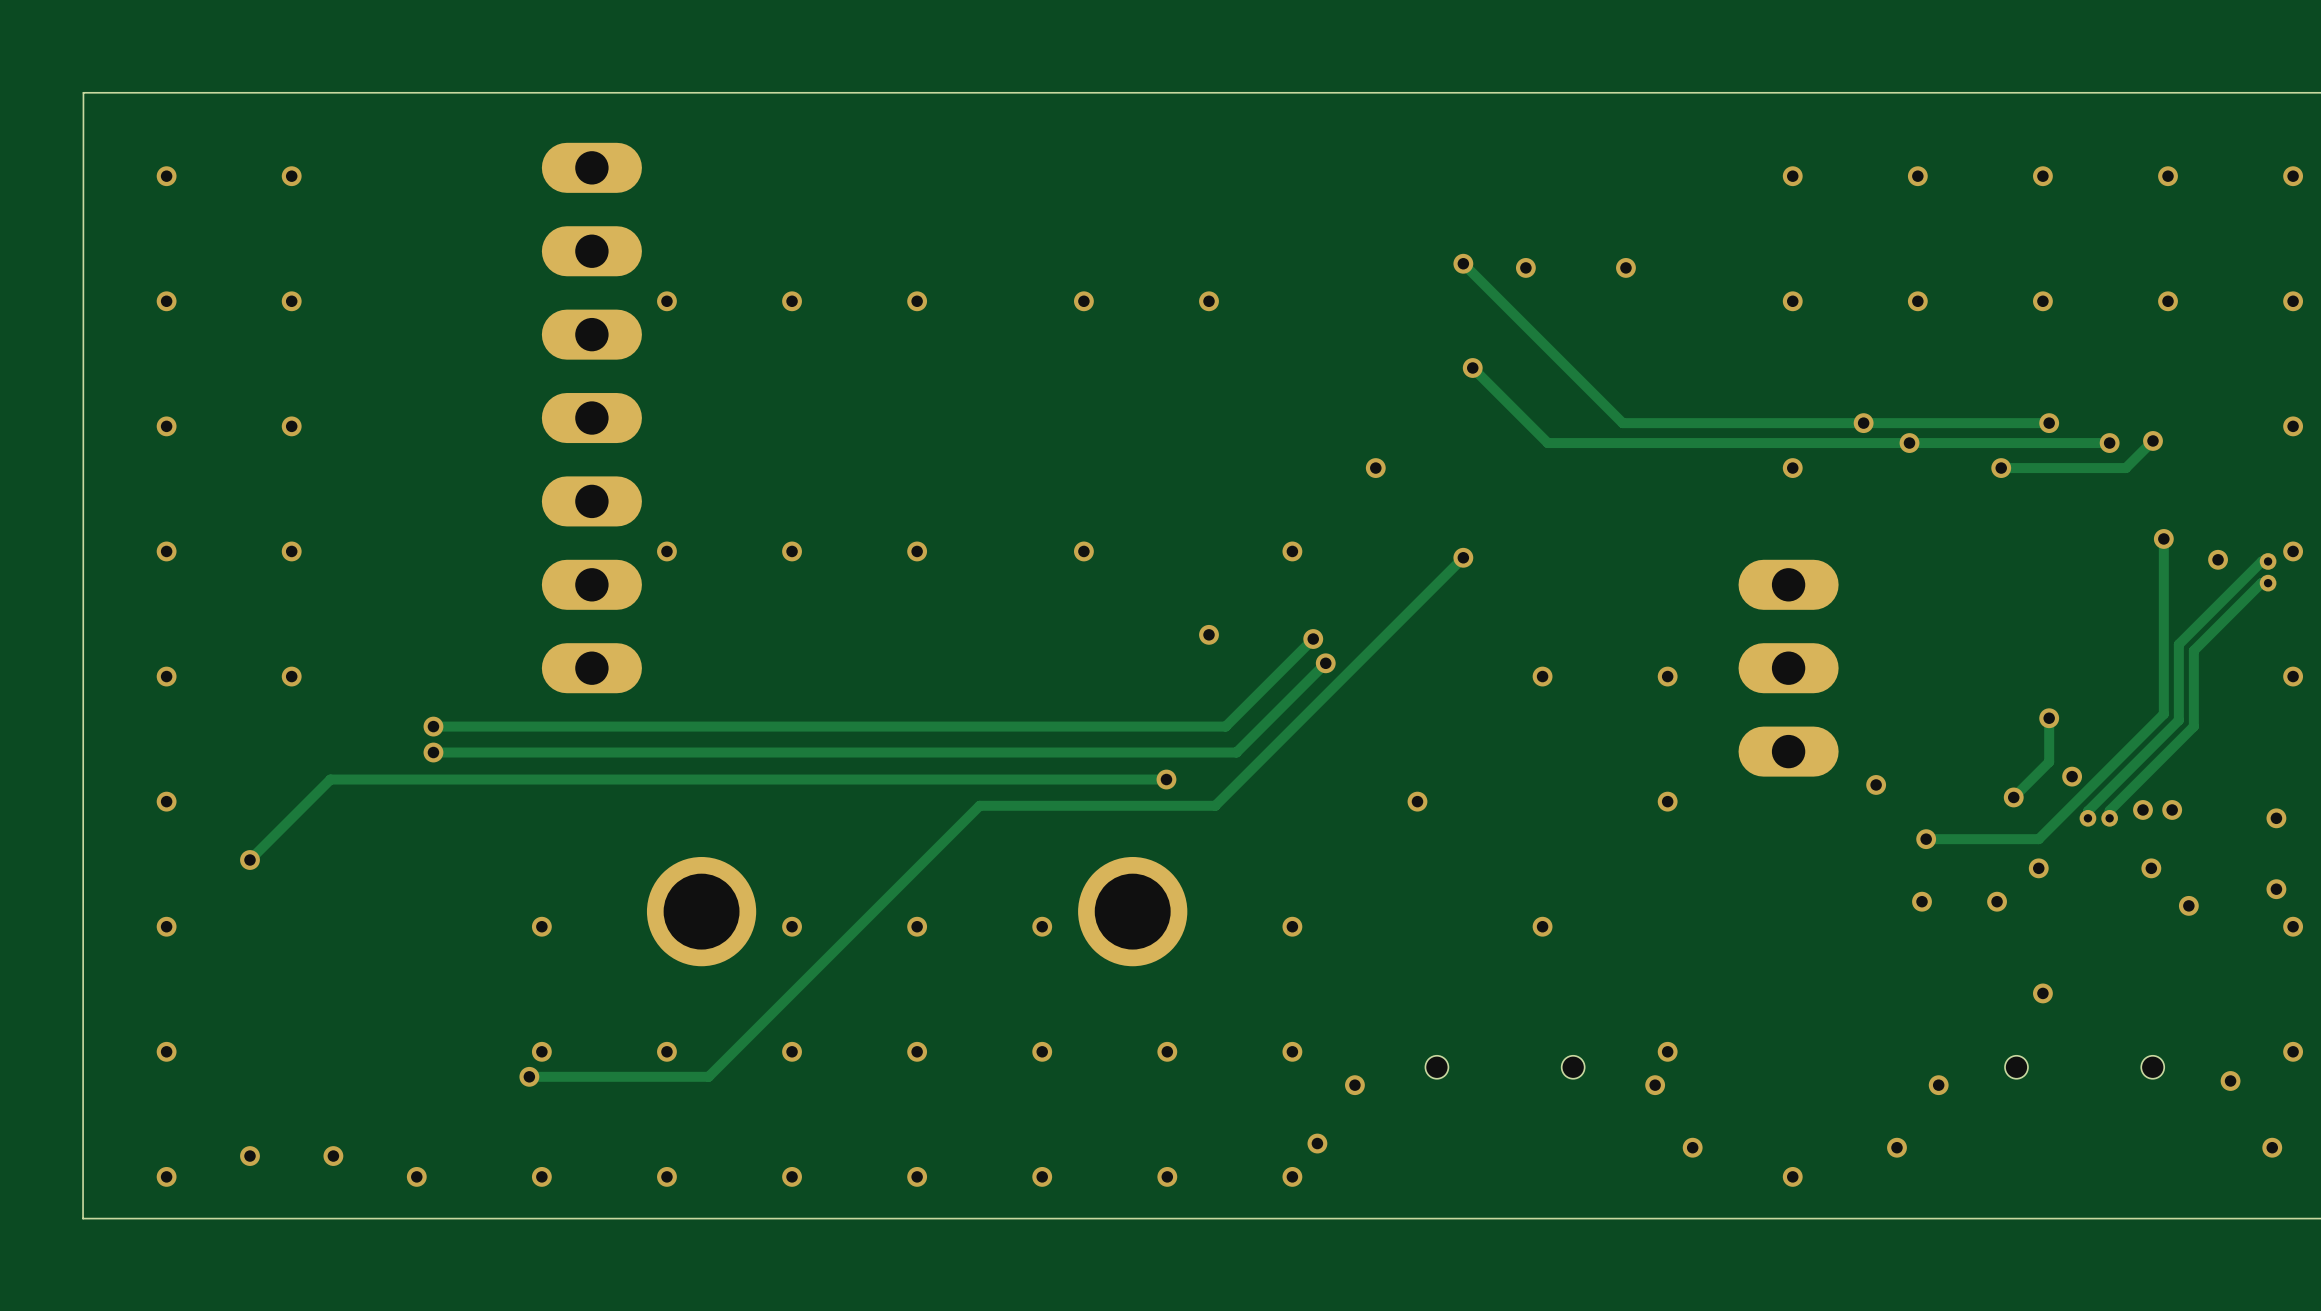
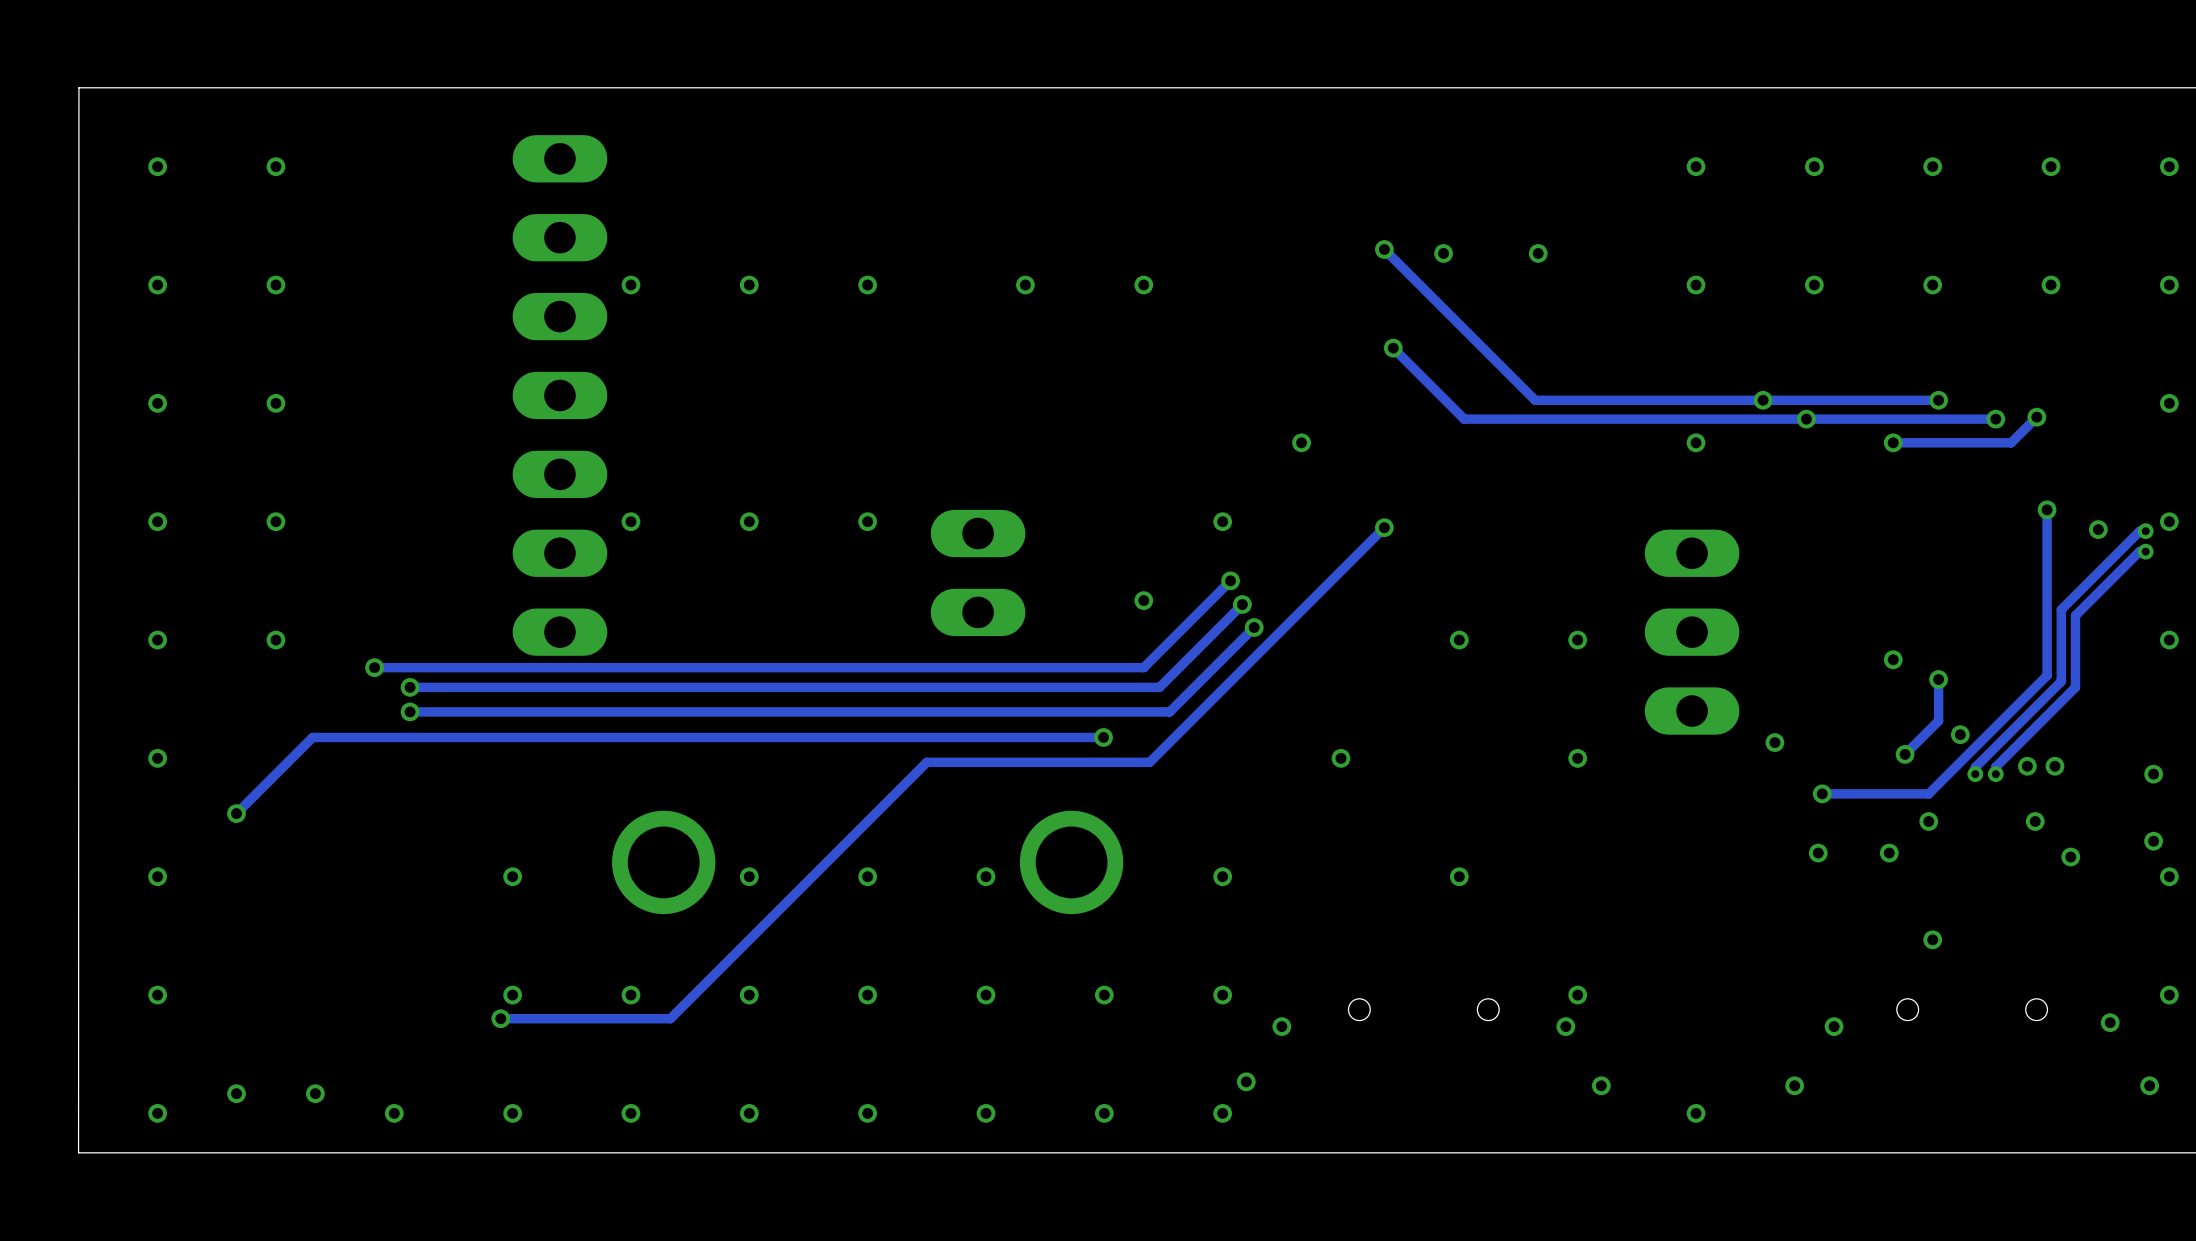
via: (1083, 551) -> none
part: none -> (978, 572)
track: none -> (1230, 580) (1143, 667) (374, 667)
via: none -> (1230, 580)
via: none -> (1893, 659)
via: none -> (374, 667)

